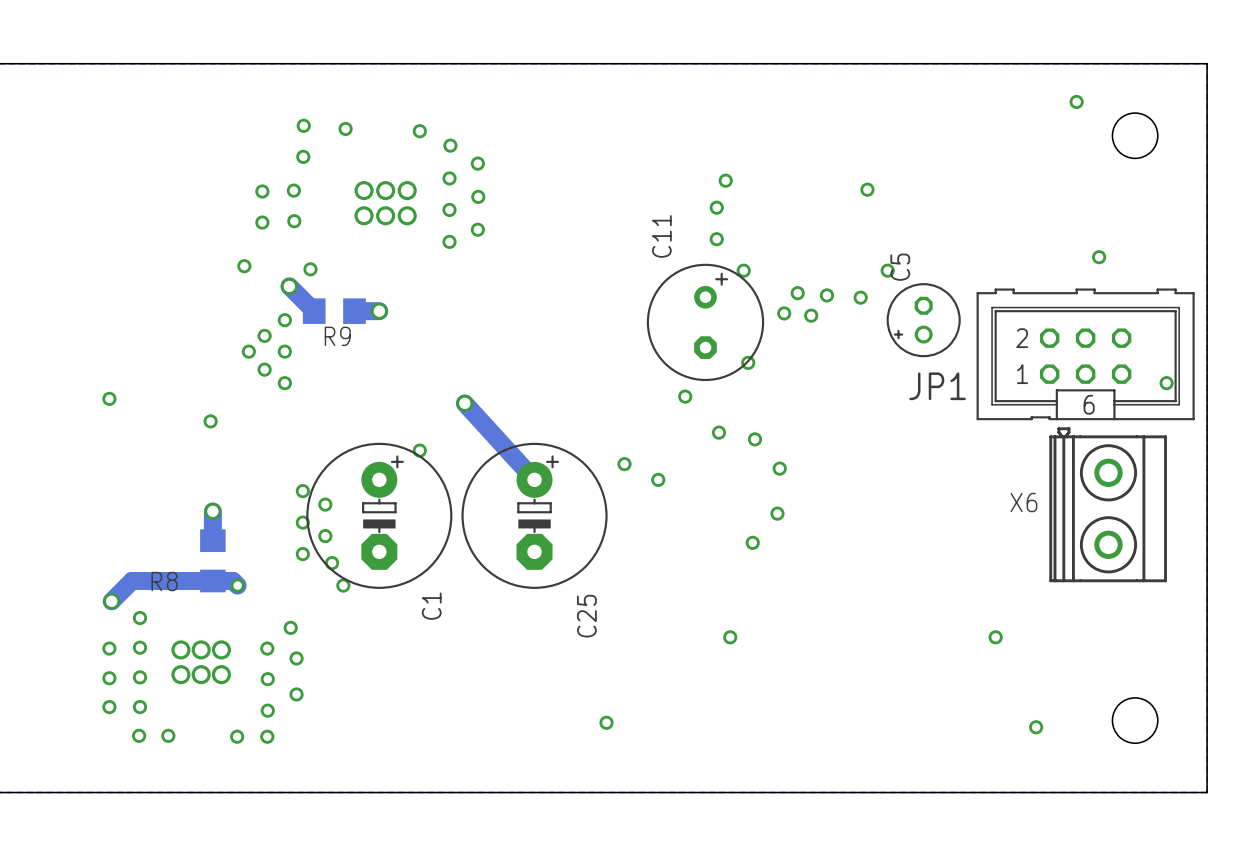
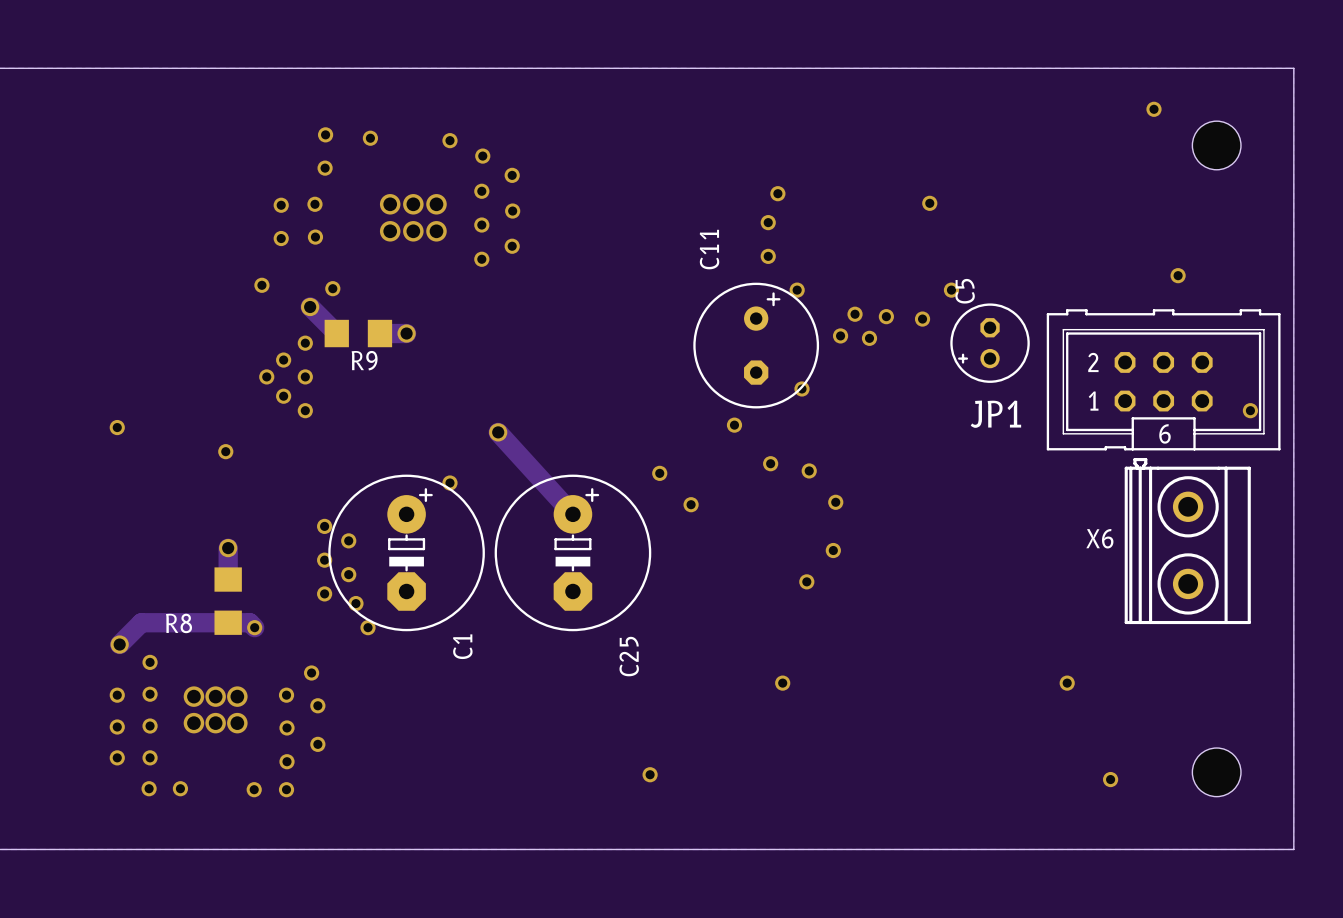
via: none -> (659, 473)
via: (624, 464) -> none
via: none -> (691, 504)
via: (658, 479) -> none

